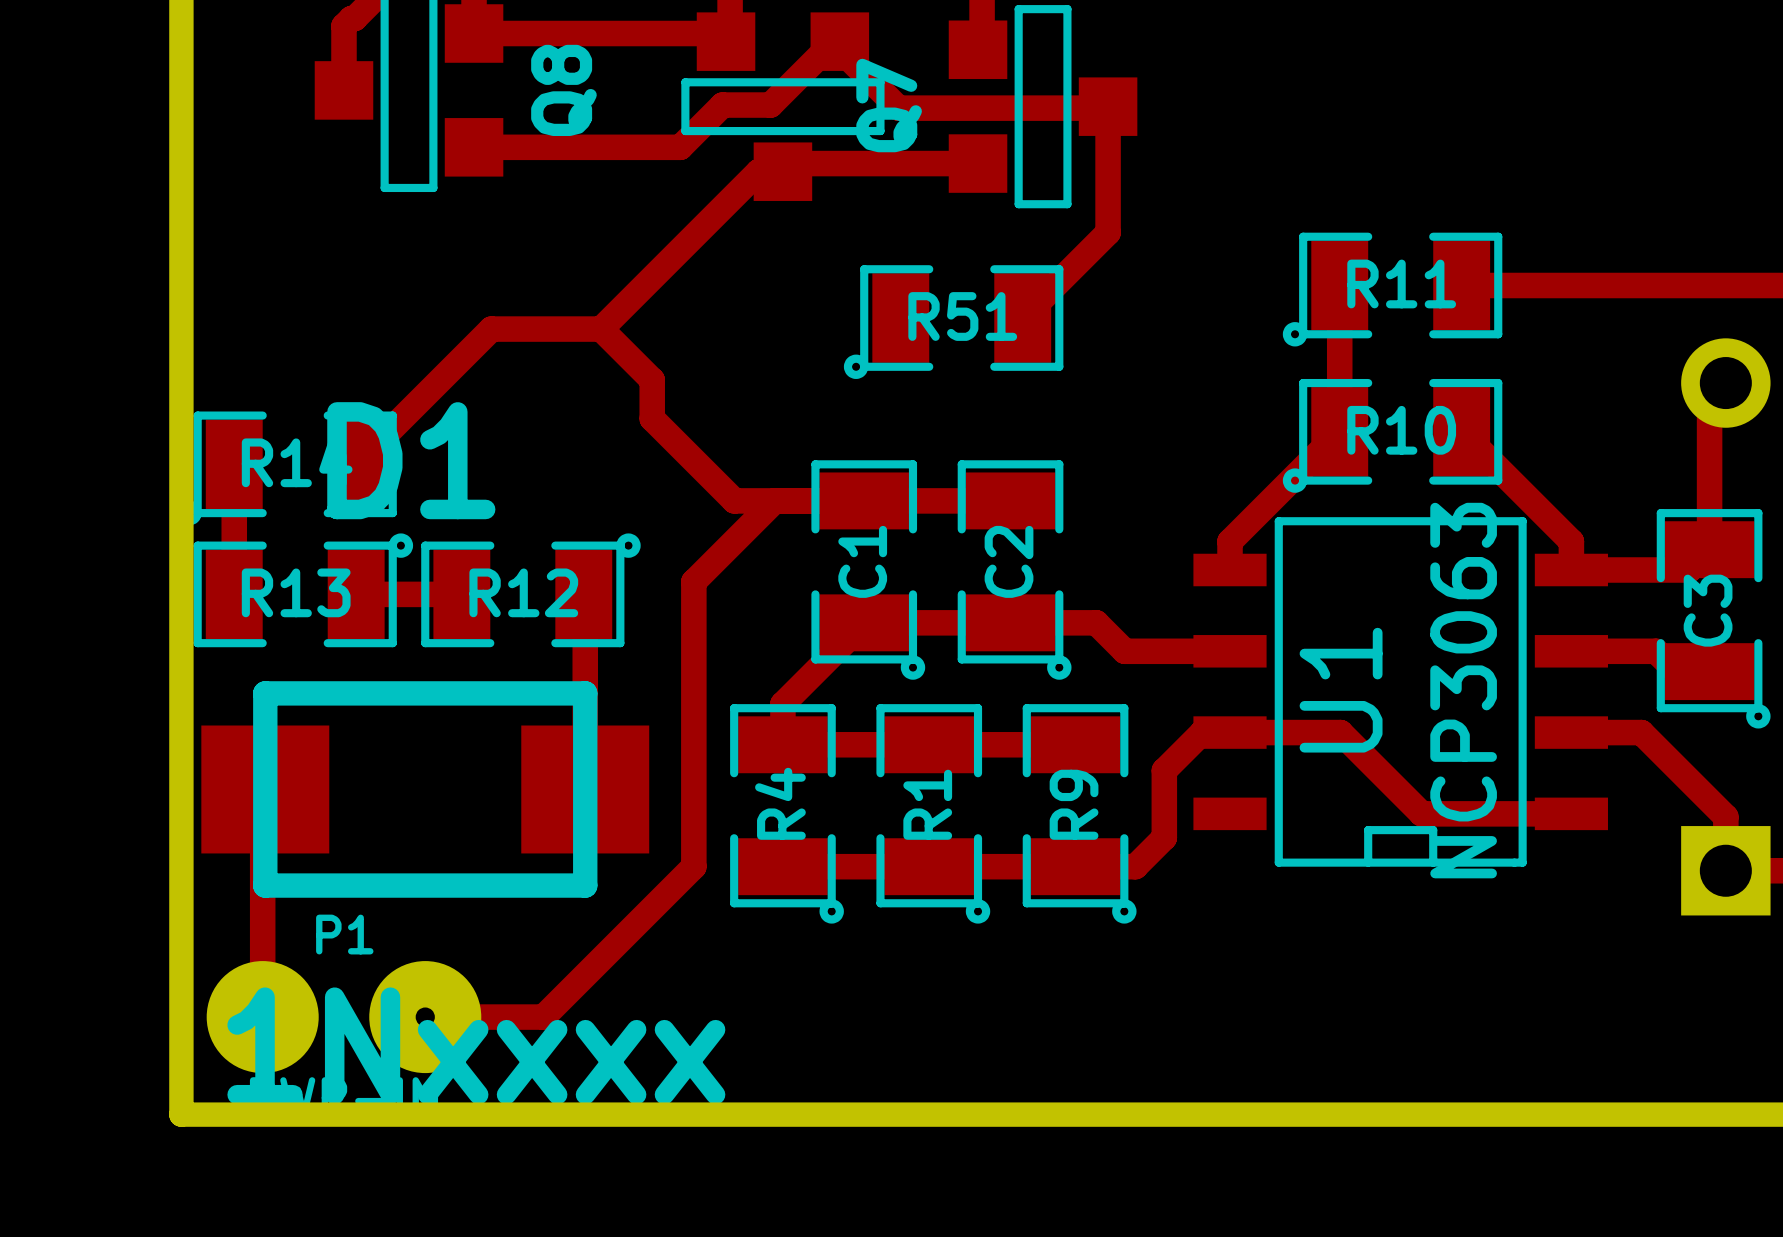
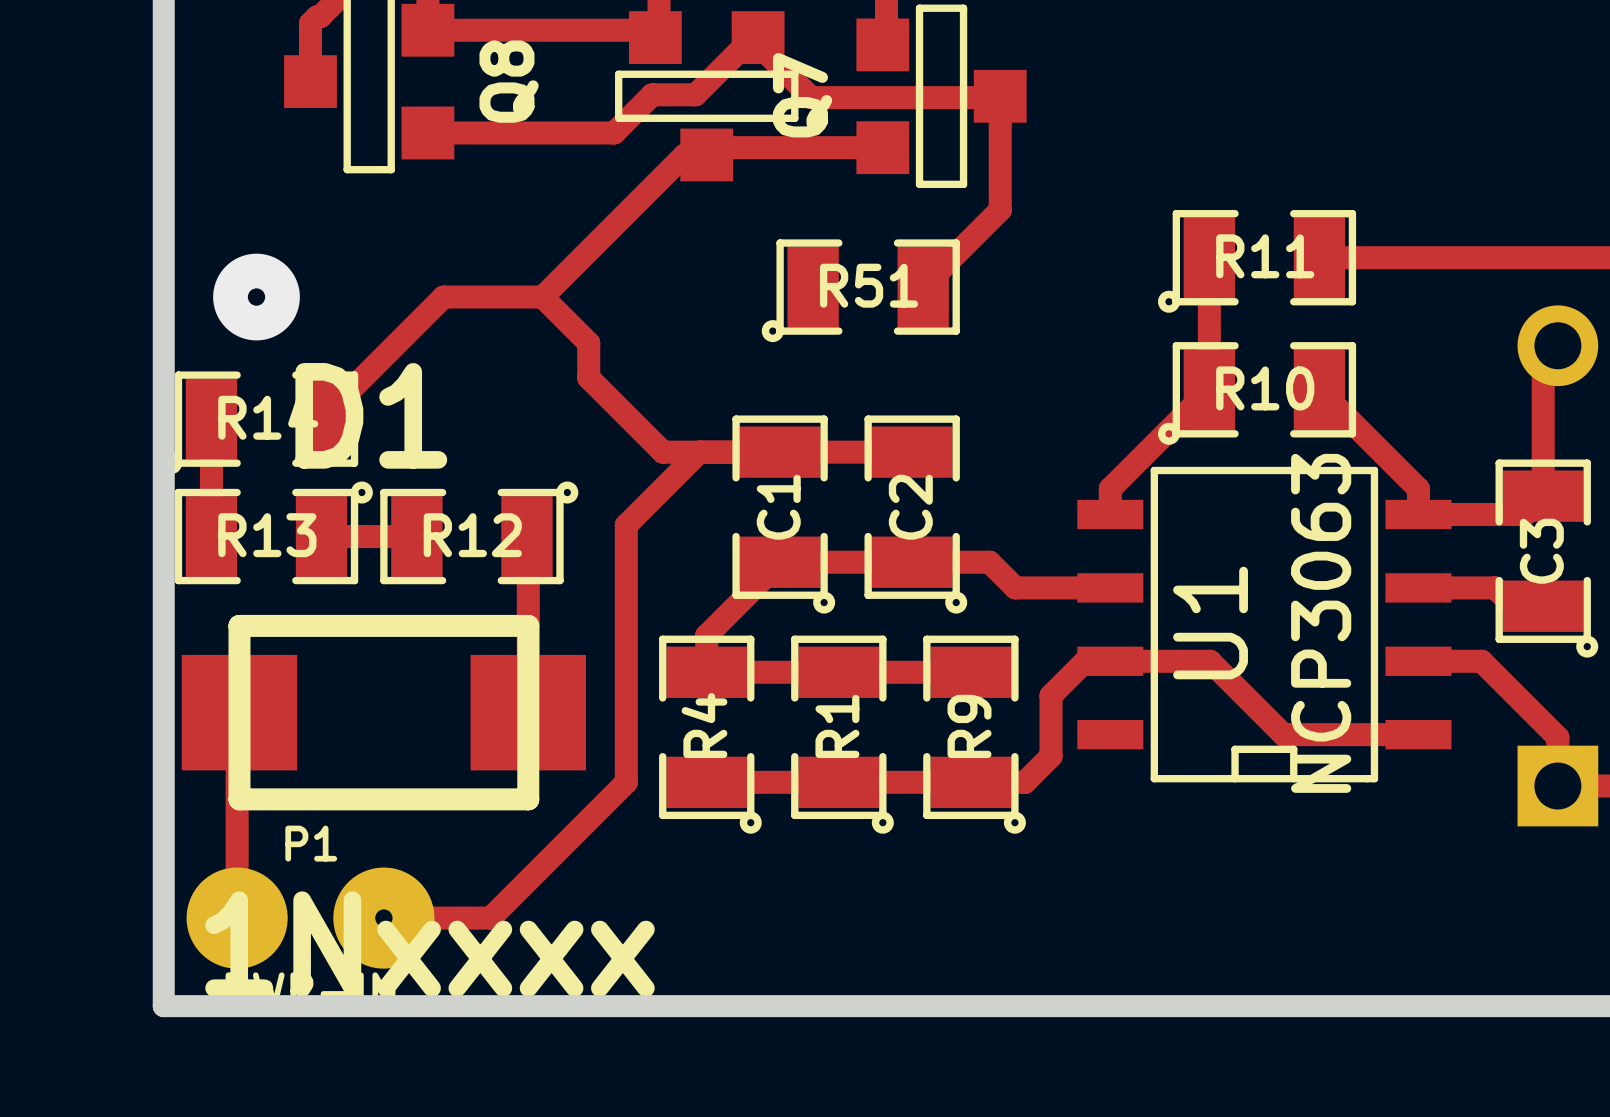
via: none -> (256, 297)

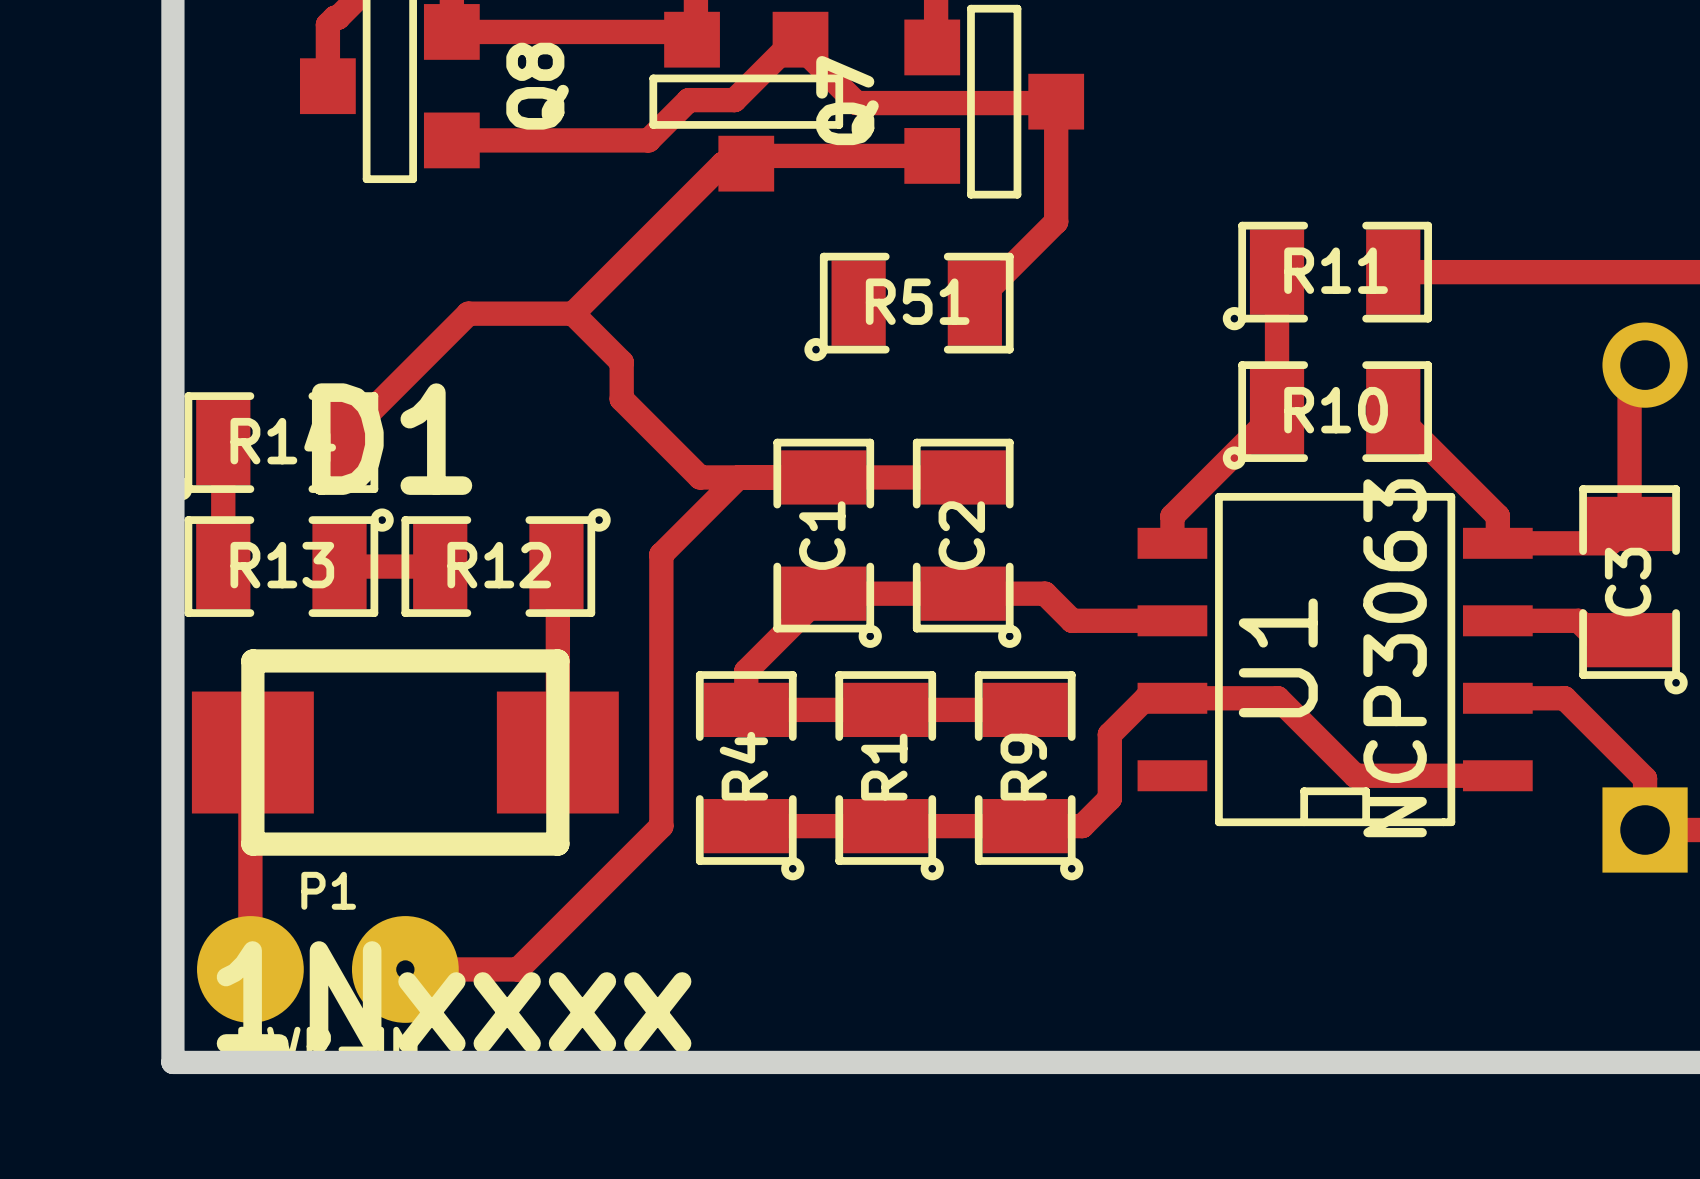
via: (256, 297) -> none

